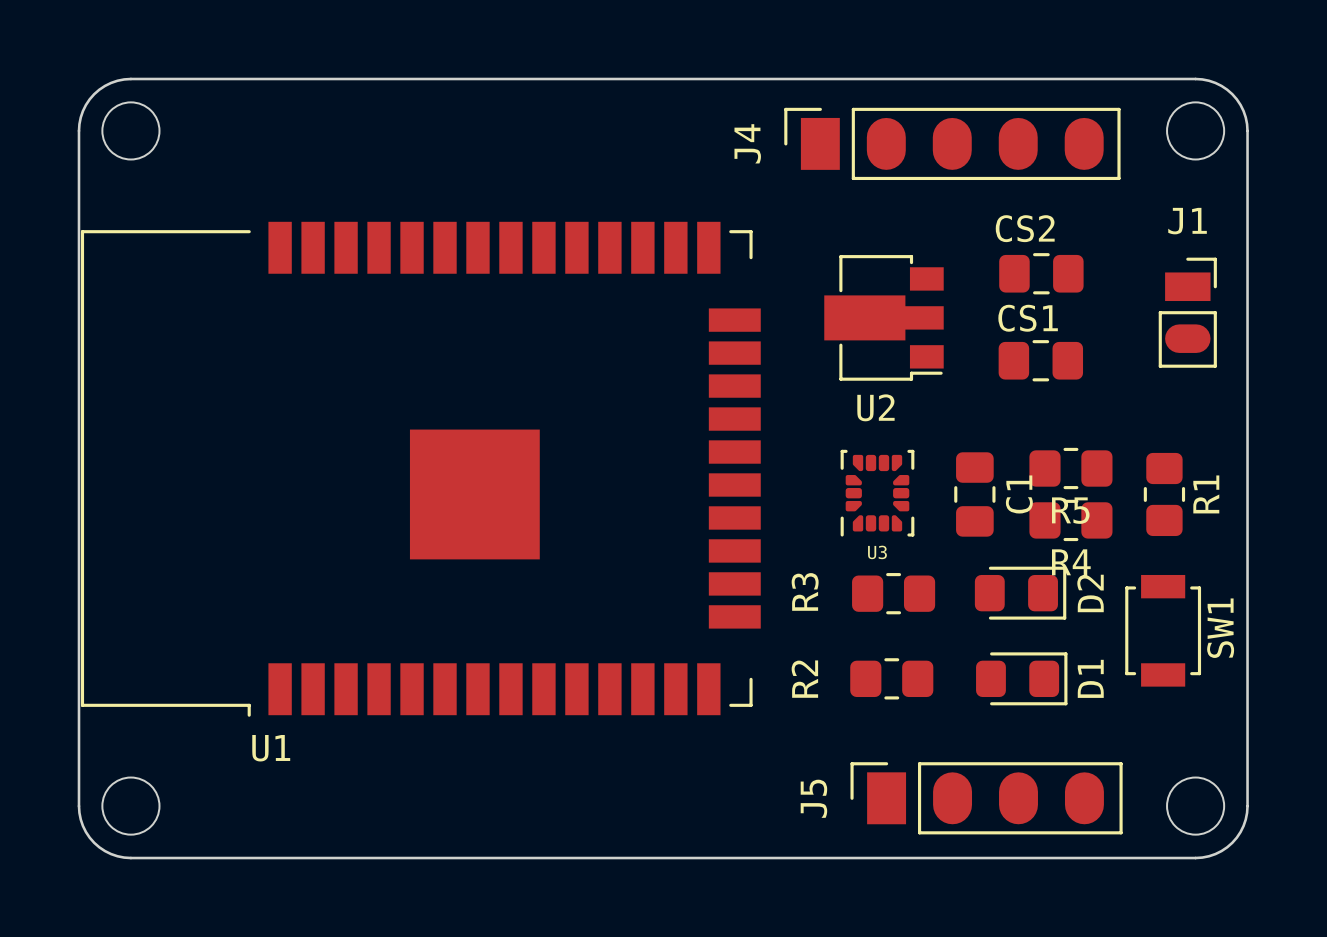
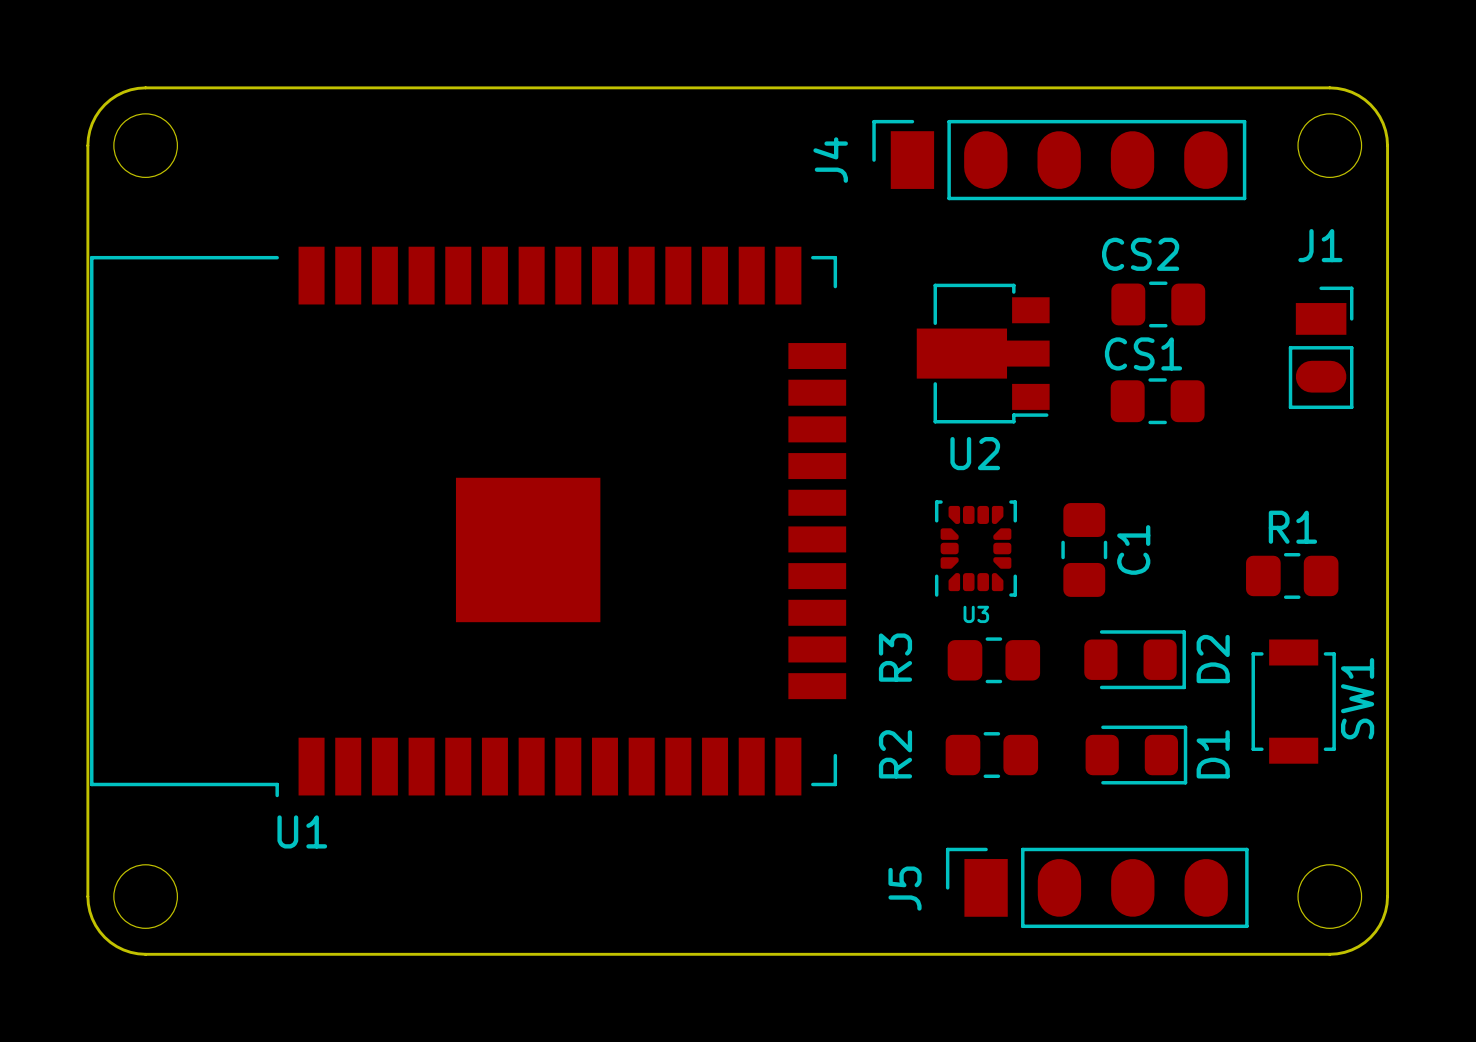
R5: (1070, 468) -> none
R1 rotation: 0° (1164, 494) -> 90° clockwise (1292, 575)
R1 name position: R1 (1206, 494) -> R1 (1292, 527)
R4: (1070, 520) -> none

